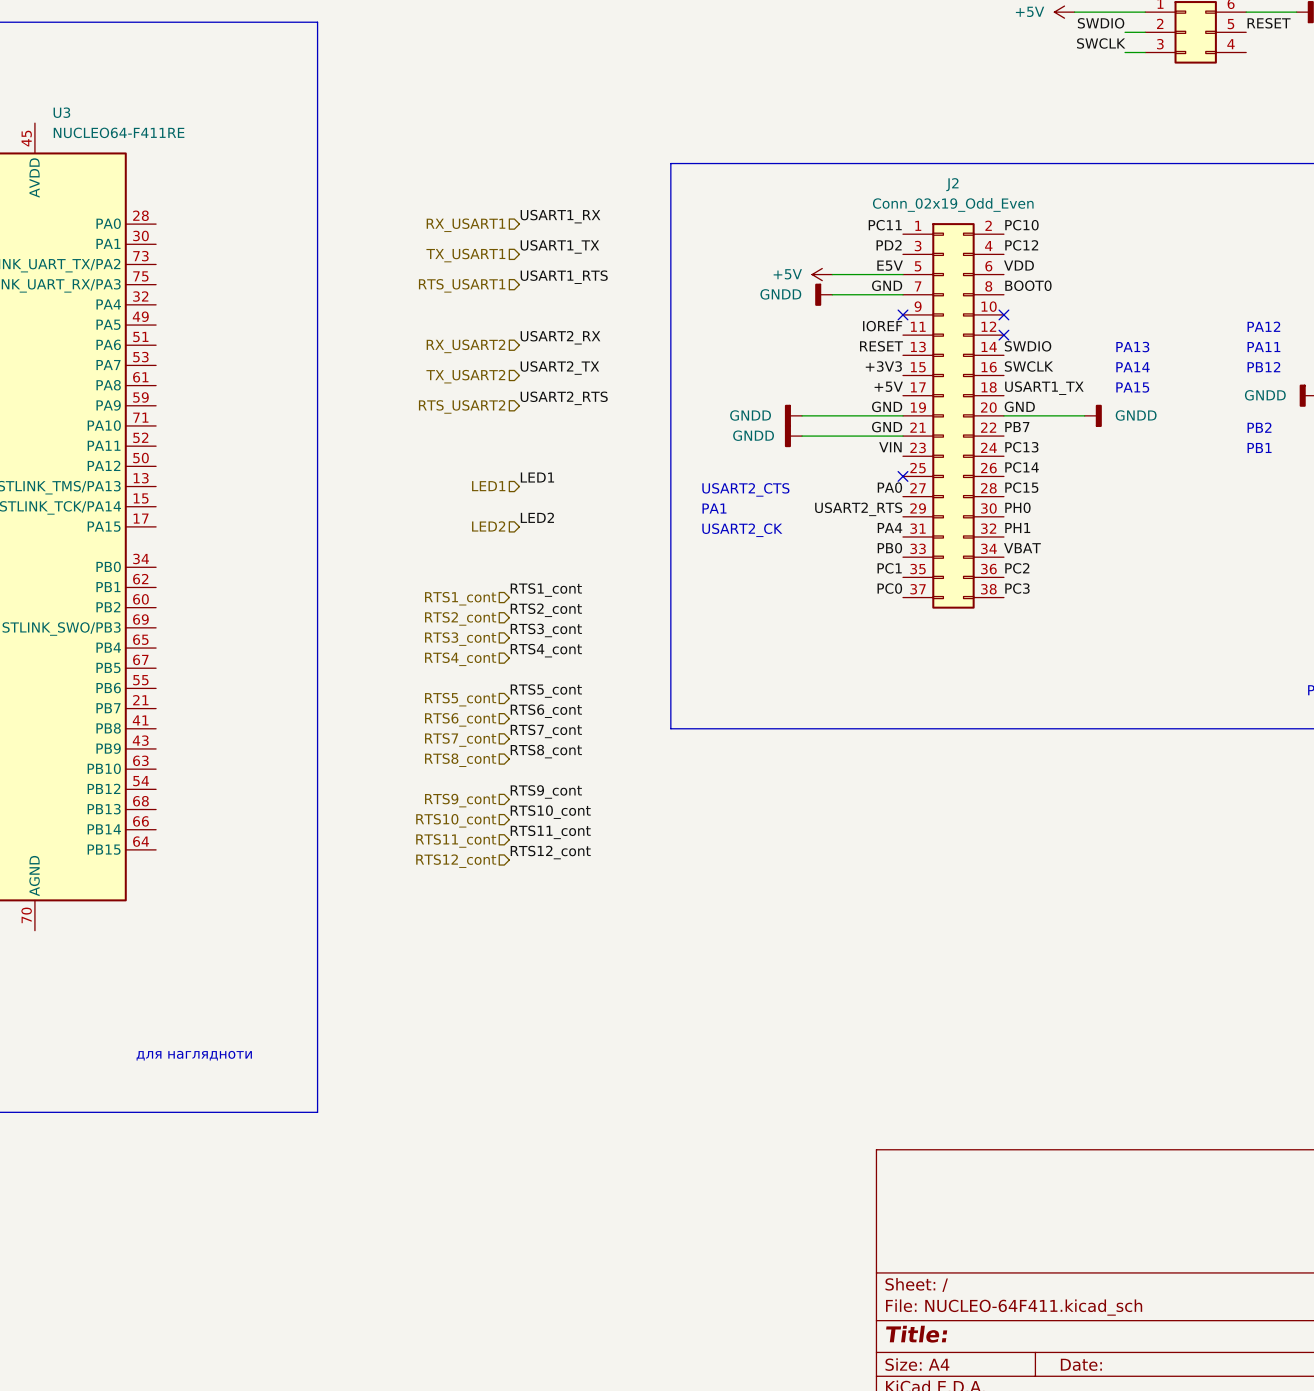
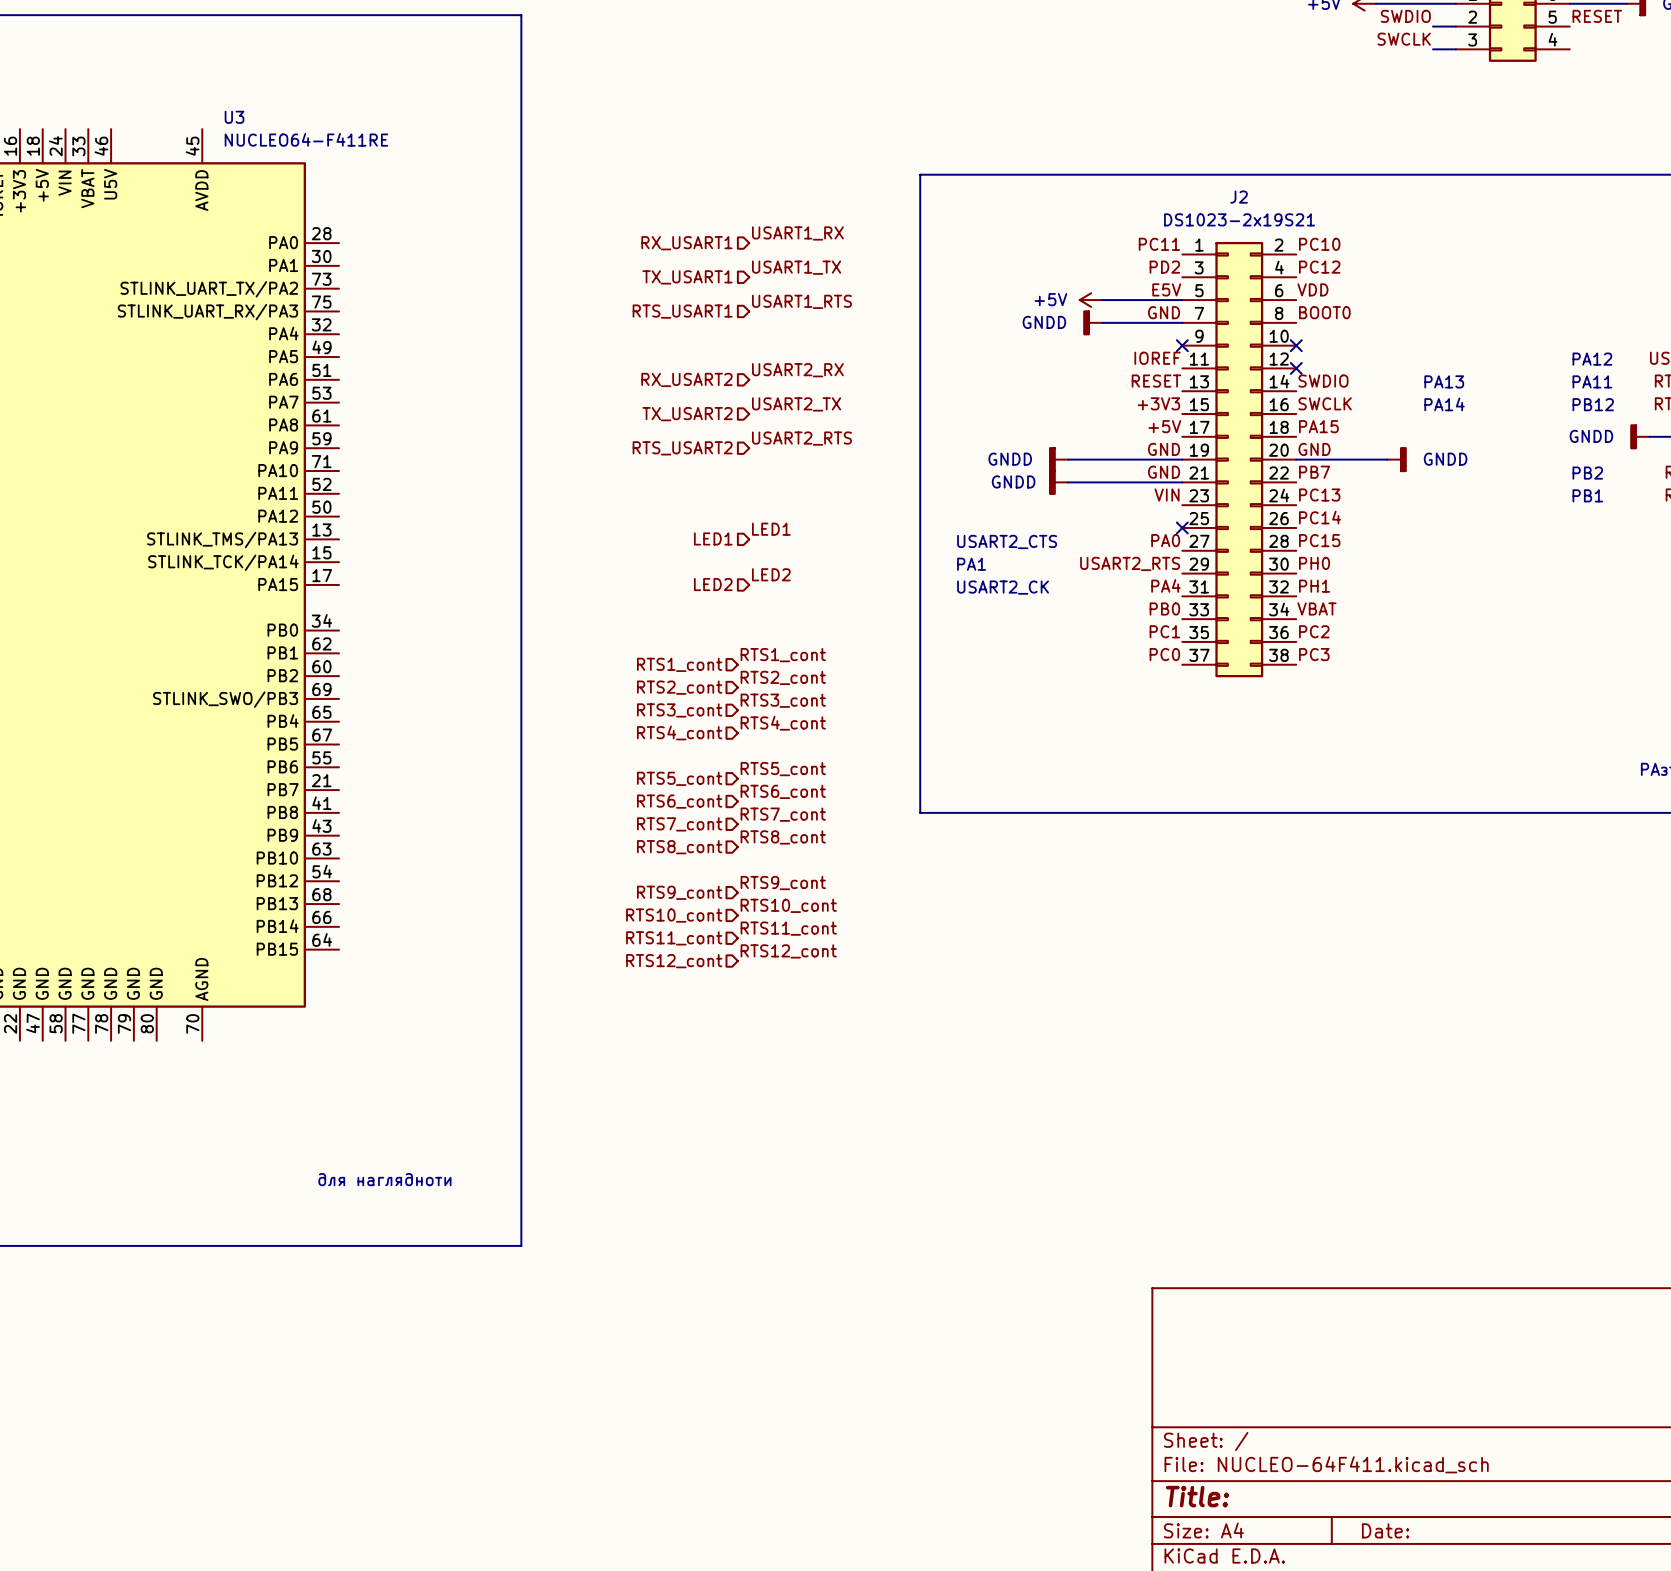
J2 value: Conn_02x19_Odd_Even (953, 204) -> DS1023-2x19S21 (1239, 219)
text: PA15 (1132, 387) -> none
label: USART1_TX (1044, 388) -> PA15 (1318, 426)

